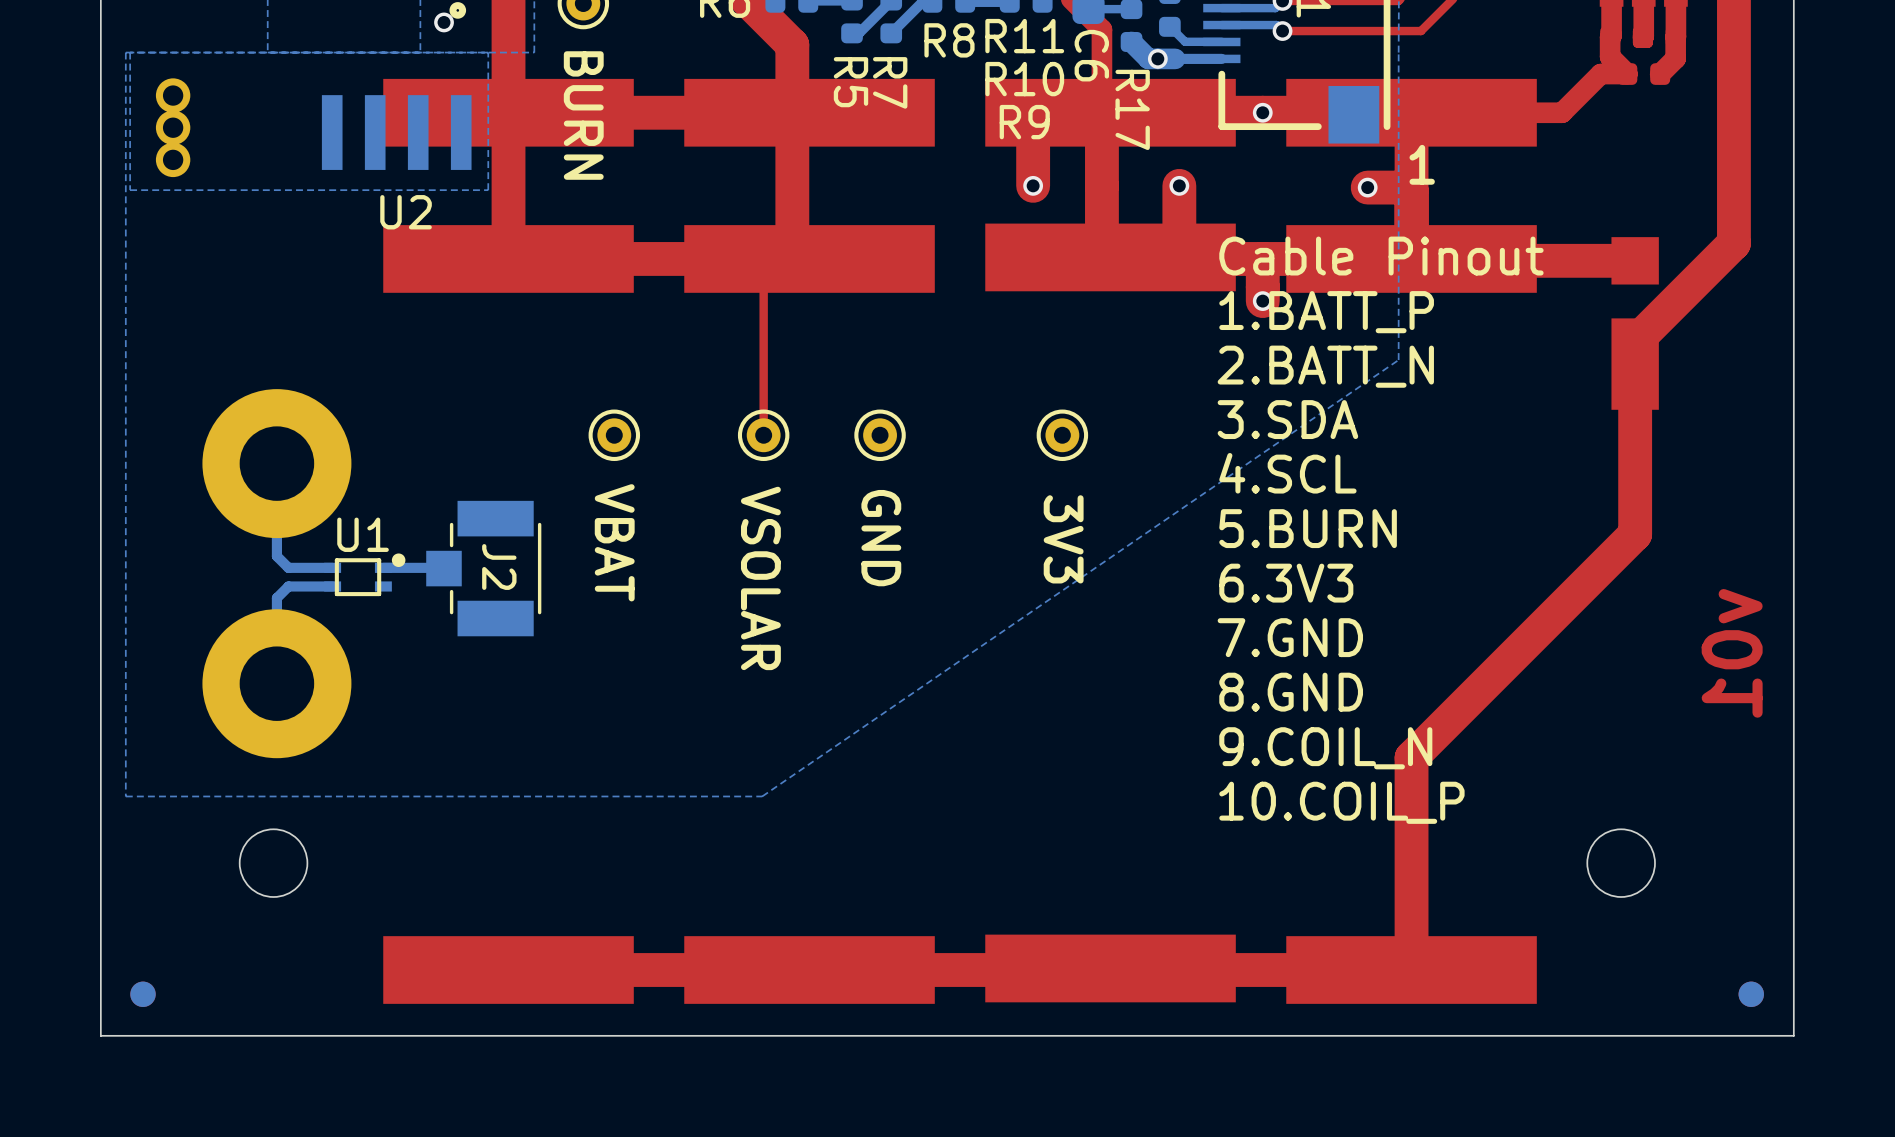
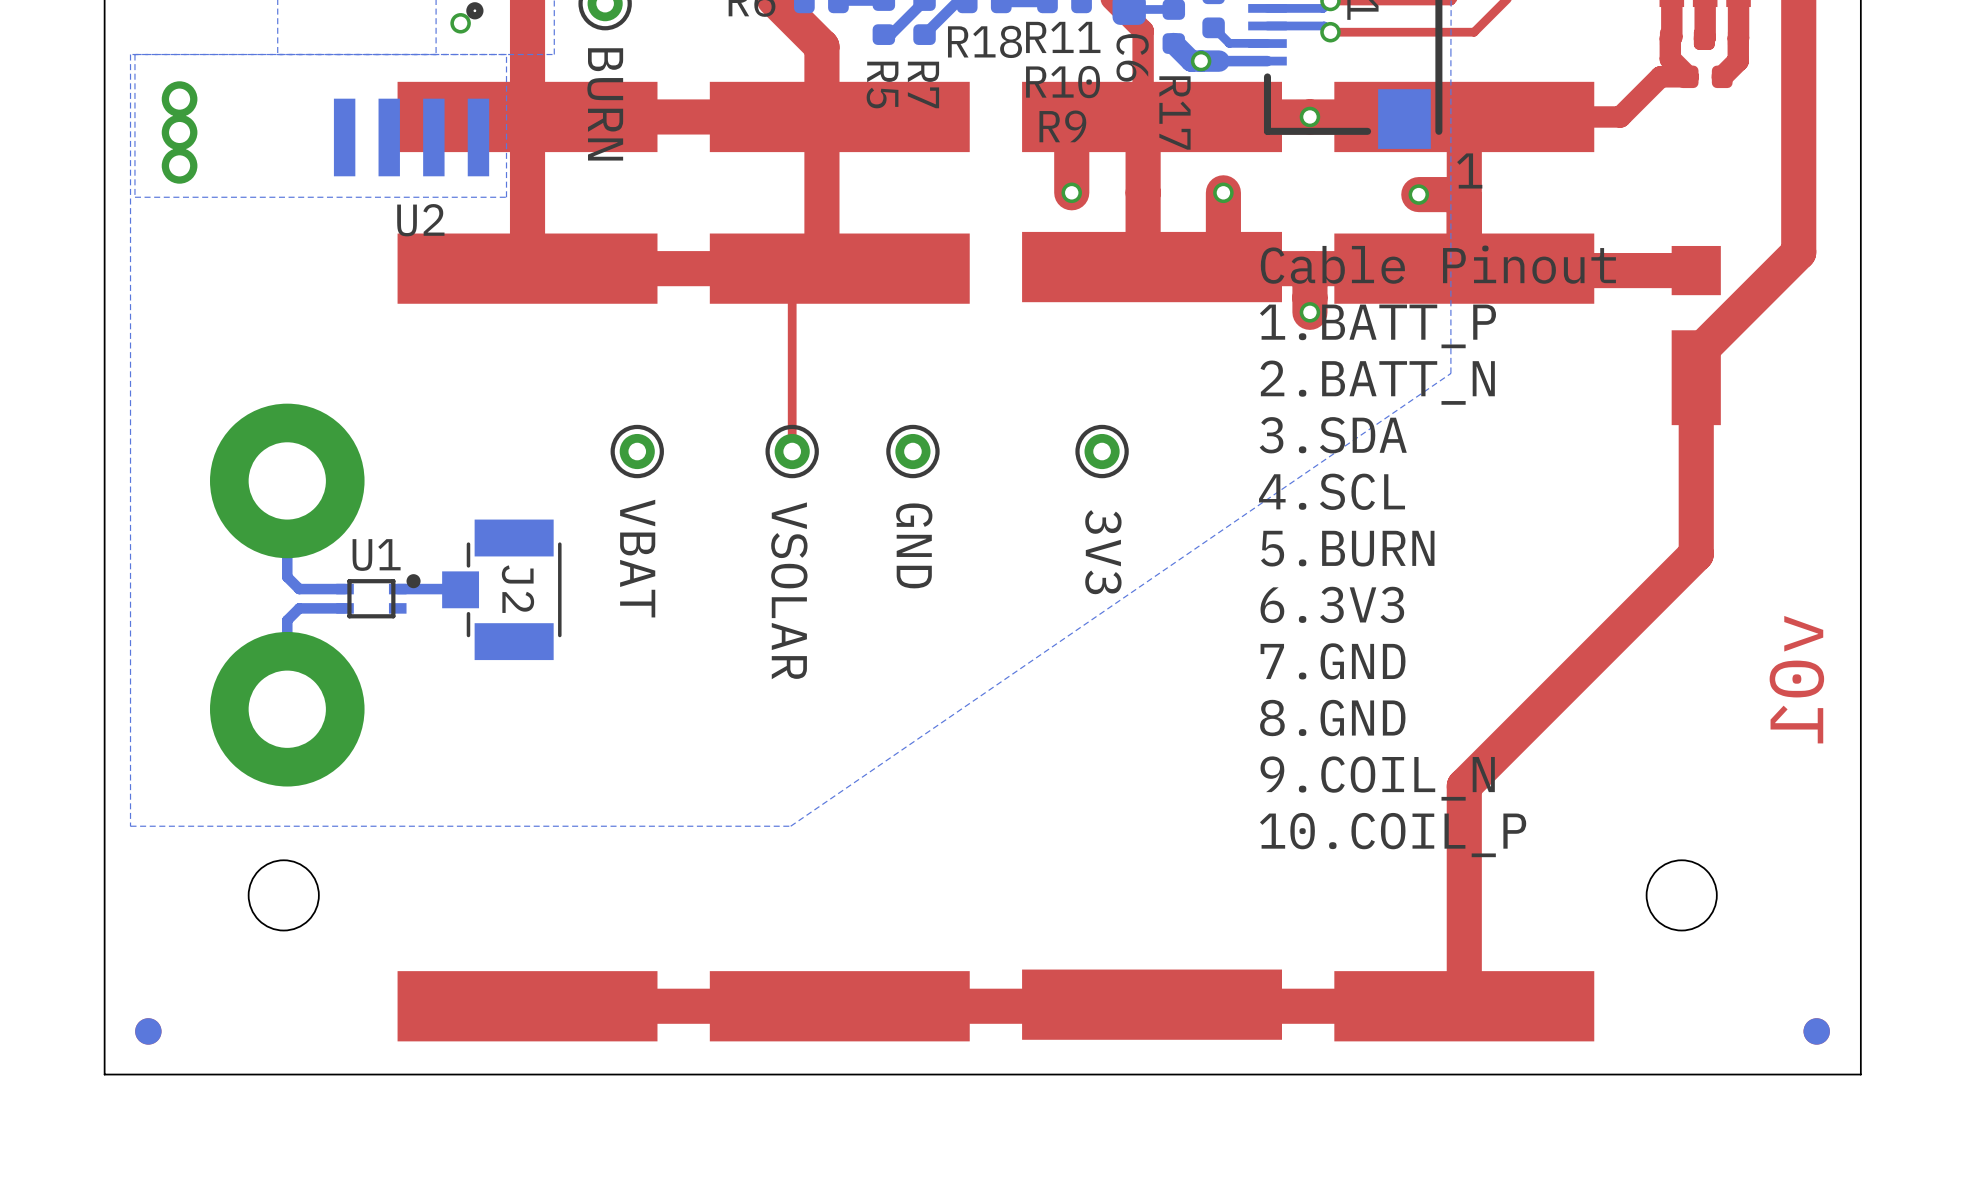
R8 name: R8 (949, 40) -> R18 (985, 41)

